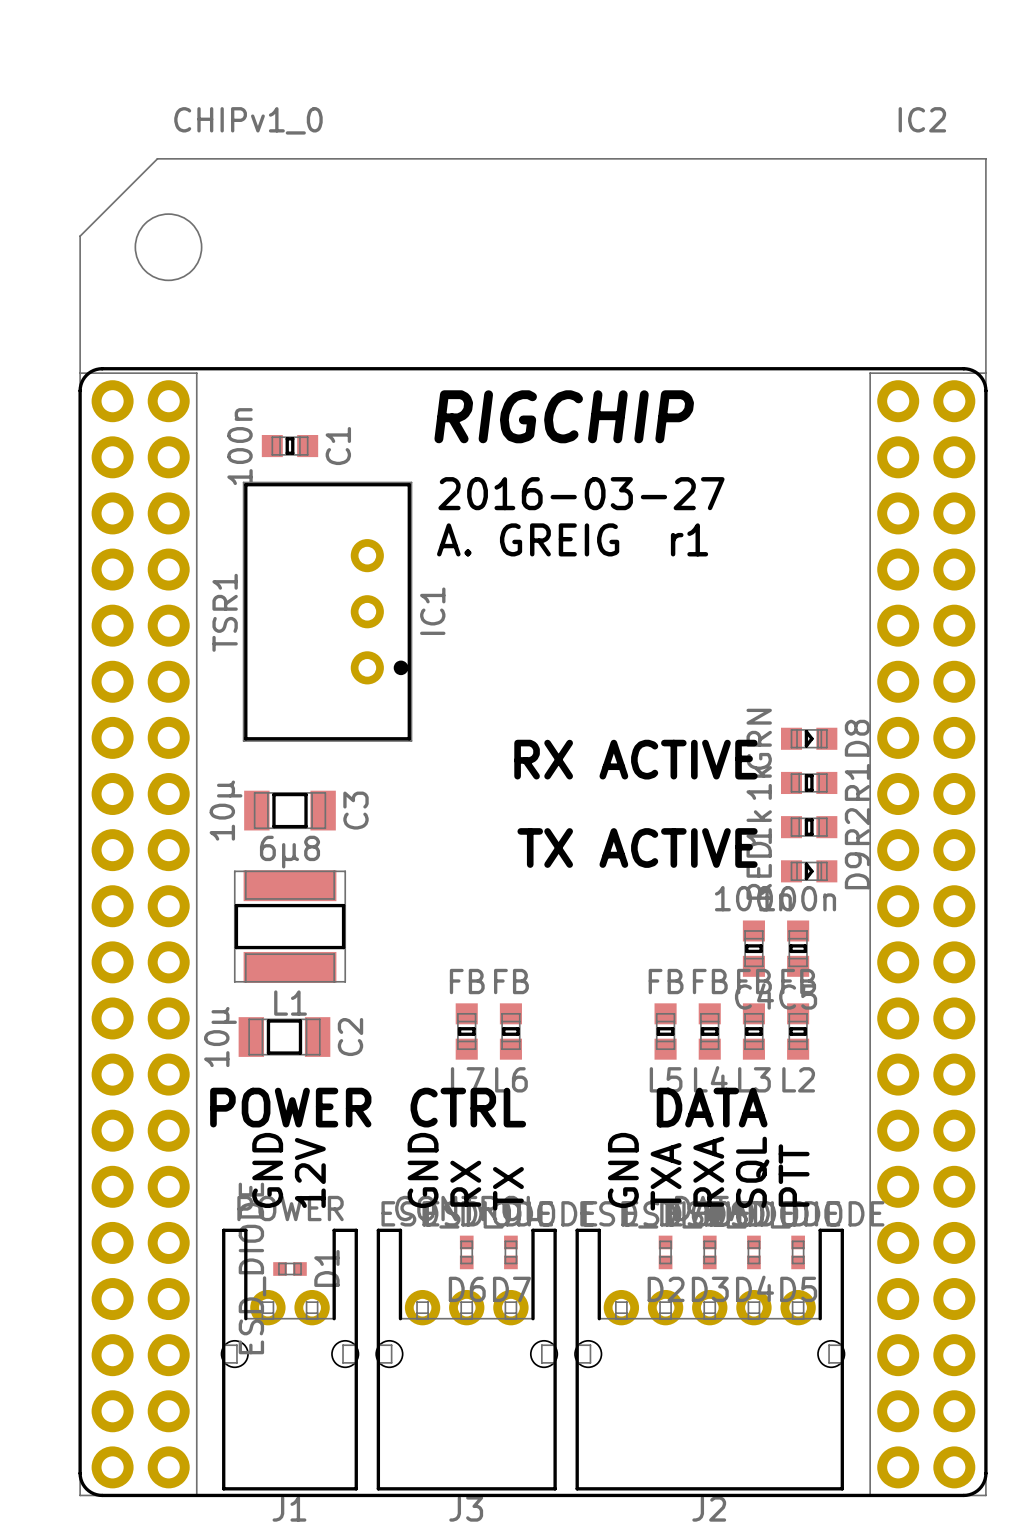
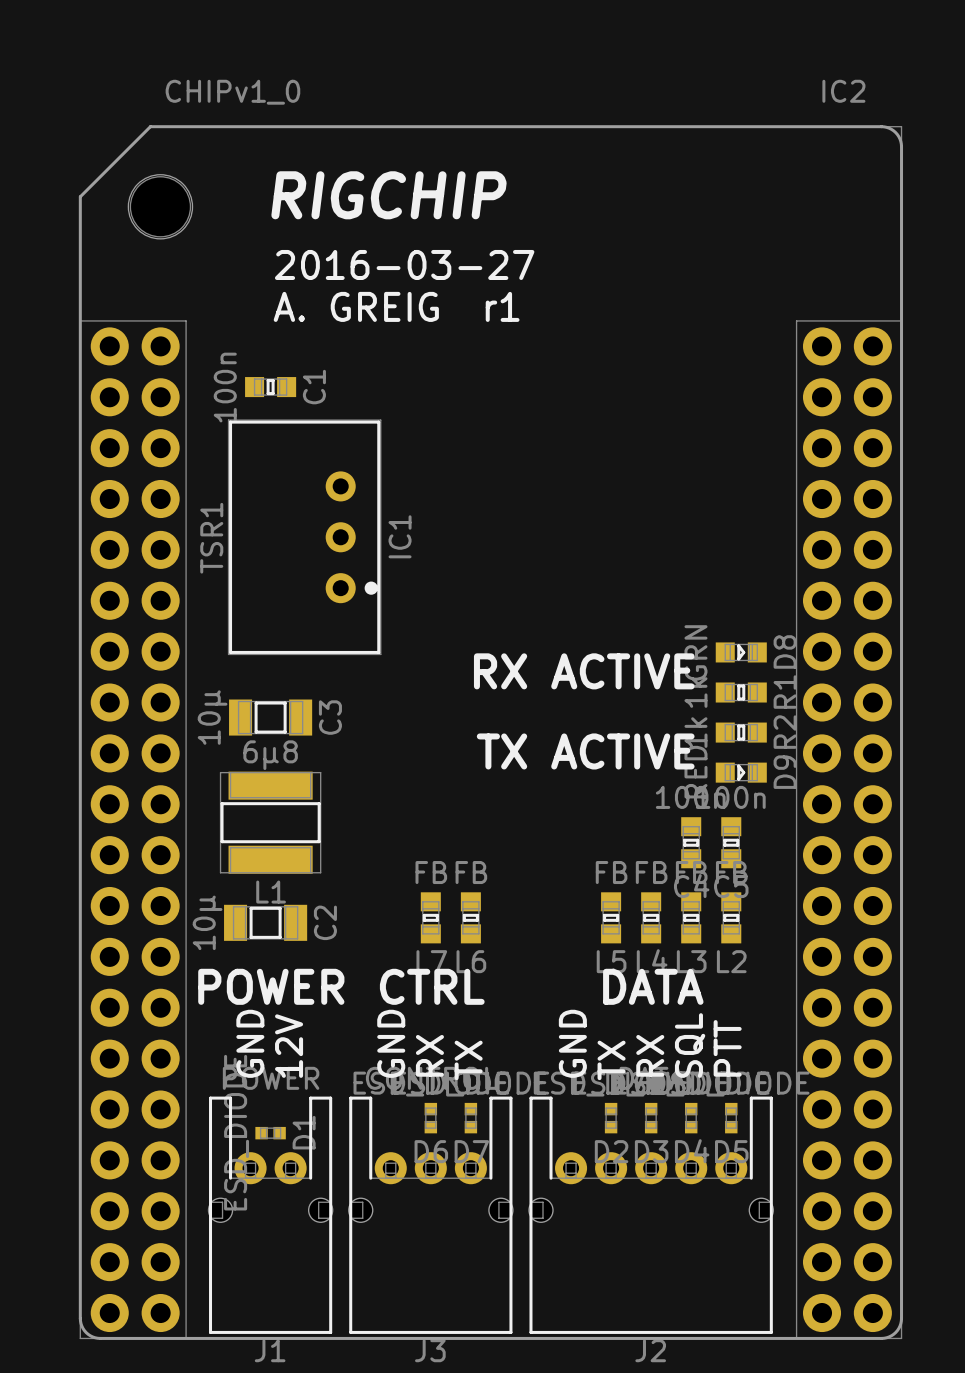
IC2 footprint: [80, 158, 987, 1496] -> [80, 126, 902, 1339]
board edge: (80, 390) (81, 382) (86, 375) (93, 370) (102, 368) (963, 368) (972, 370) (979, 375) (984, 382) (985, 390) -> (80, 336) (80, 196) (150, 126) (886, 127) (895, 132) (901, 144) (901, 336)
text position: RIGCHIP (564, 416) -> RIGCHIP (389, 195)
text position: 2016-03-27 (581, 493) -> 2016-03-27 (404, 264)
text position: A. GREIG r1 (572, 539) -> A. GREIG r1 (396, 306)
text: RXA (708, 1171) -> RX (650, 1055)
text: TXA (666, 1176) -> TX (611, 1060)

